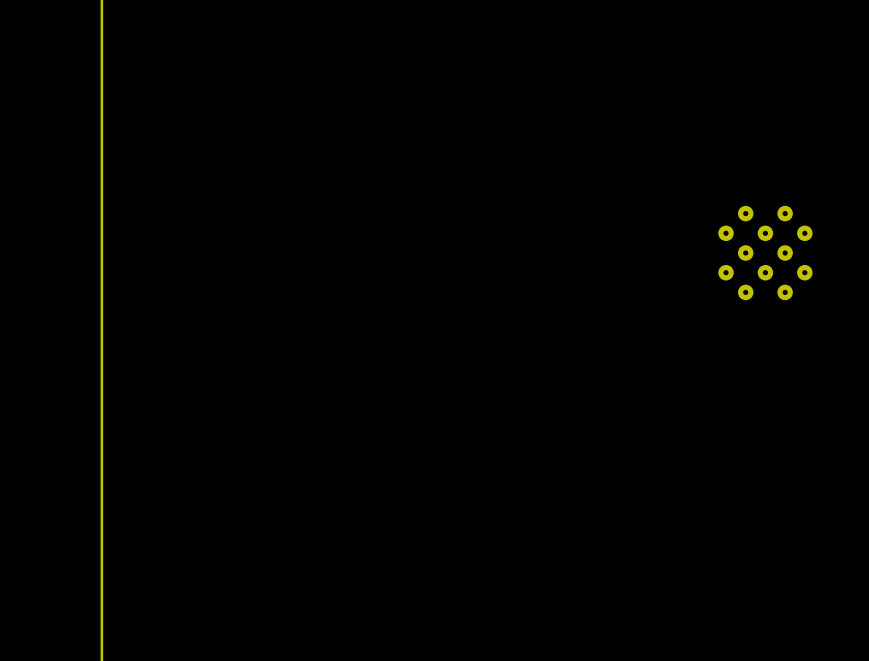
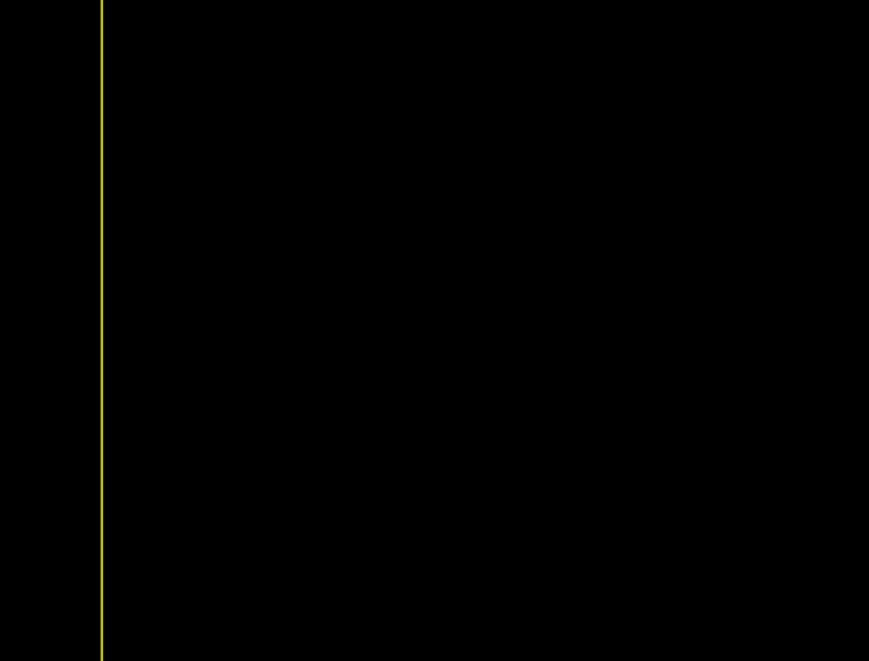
part: (765, 253) -> none

